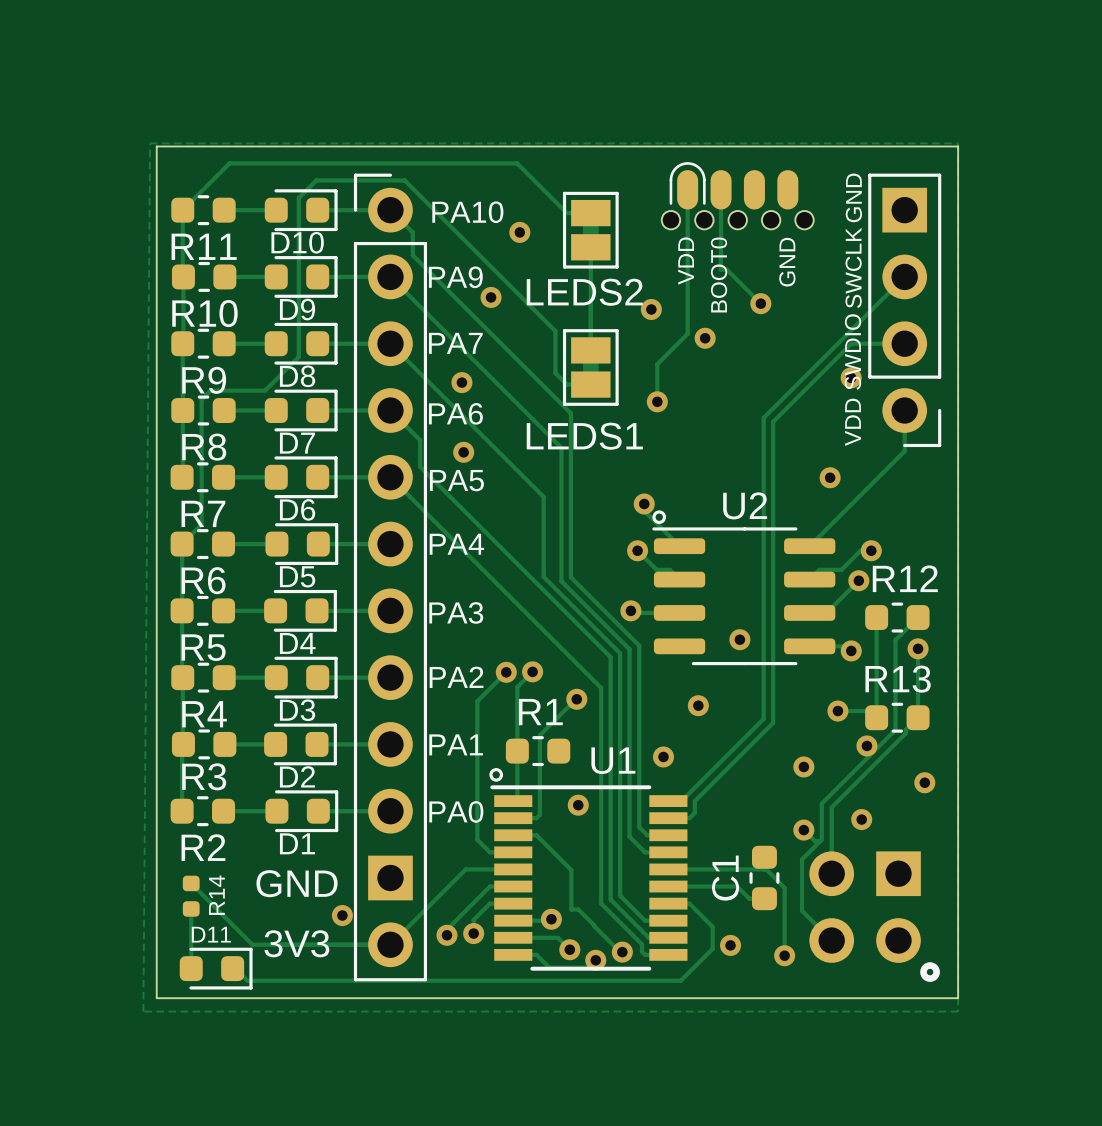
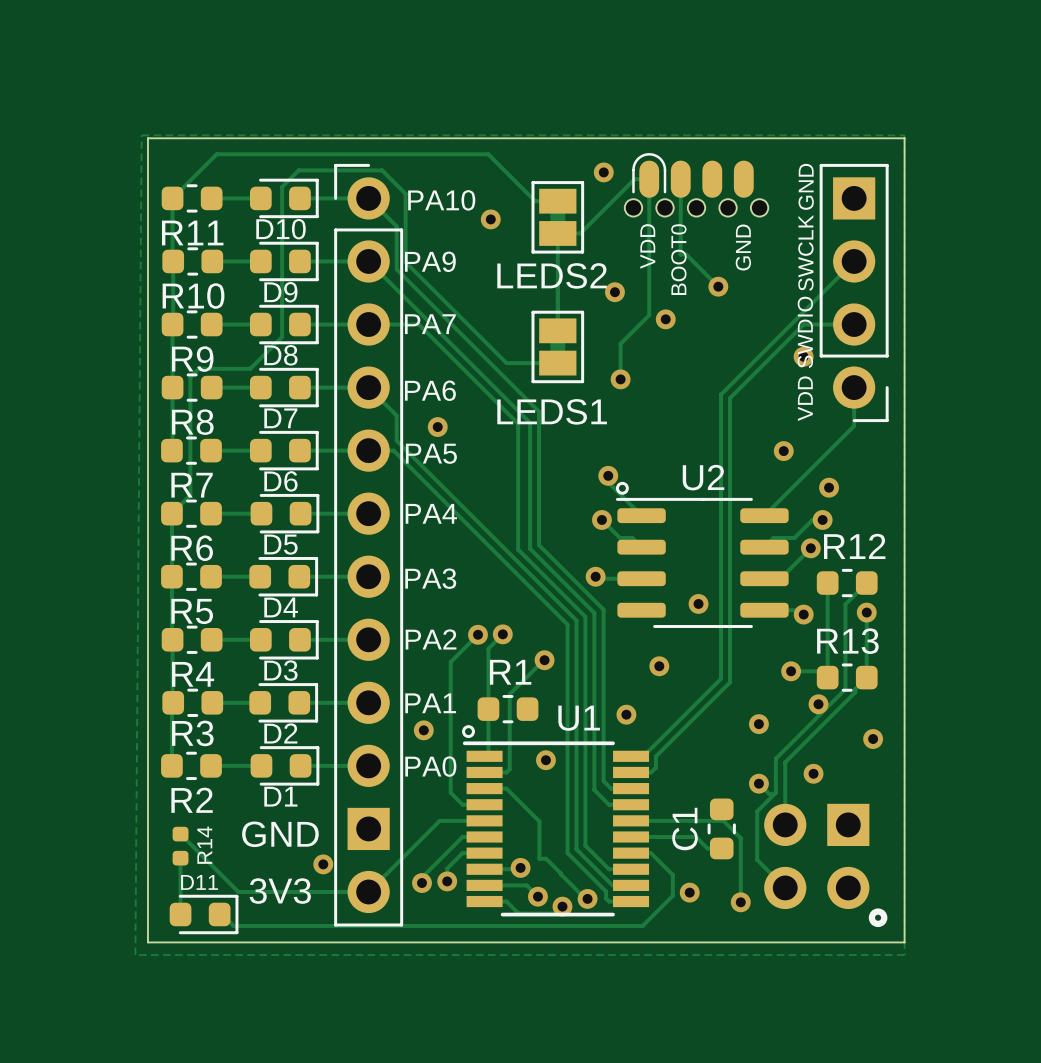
via: none -> (603, 172)
track: none -> (649, 179) (634, 179) (580, 233) (557, 233)
track: (429, 205) (555, 331) (555, 373) (566, 384) -> (405, 193) (405, 262) (506, 363) (535, 363)
track: (412, 232) (412, 255) (570, 413) (570, 436) -> (389, 219) (396, 226) (396, 269) (539, 411)
via: (491, 297) -> none
track: (390, 343) (543, 496) (543, 576) (548, 582) -> (368, 324) (418, 324) (518, 423) (518, 549)
via: (461, 382) -> none
track: (390, 477) (601, 687) -> (368, 450) (393, 450) (567, 624) (567, 649)
via: none -> (829, 487)
via: none -> (423, 730)

